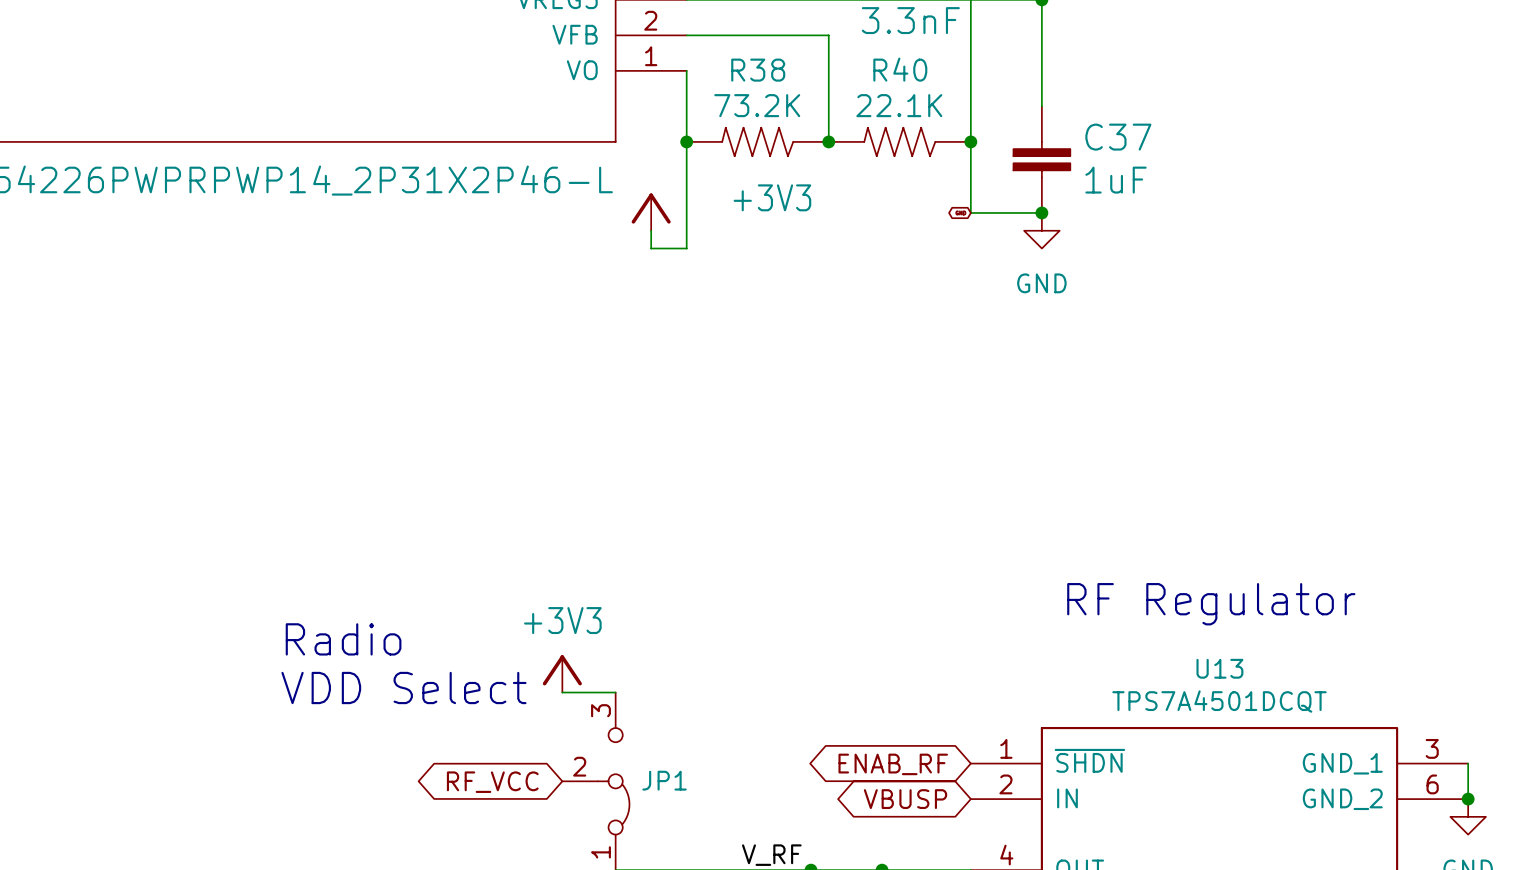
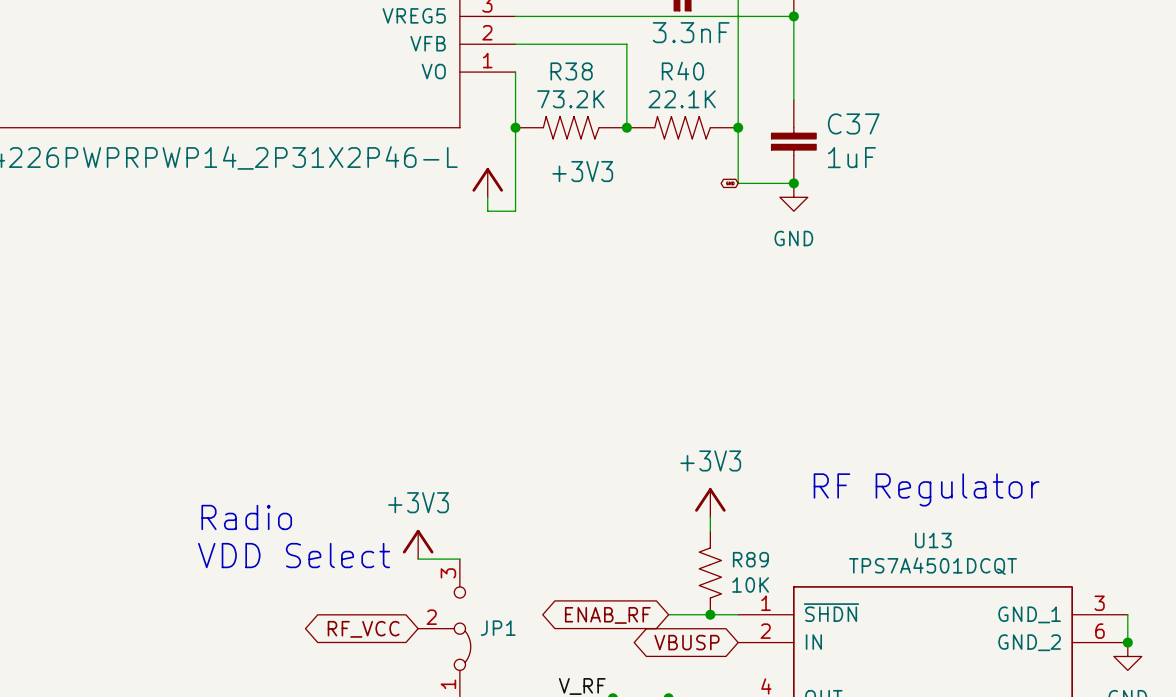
power symbol: none -> +3V3 (710, 502)
wire: none -> (710, 517) (710, 531)
R89: none -> 10K (710, 573)
wire: none -> (668, 614) (738, 614)
junction: none -> (710, 614)
global label position: ENAB_RF (893, 764) -> ENAB_RF (607, 615)

